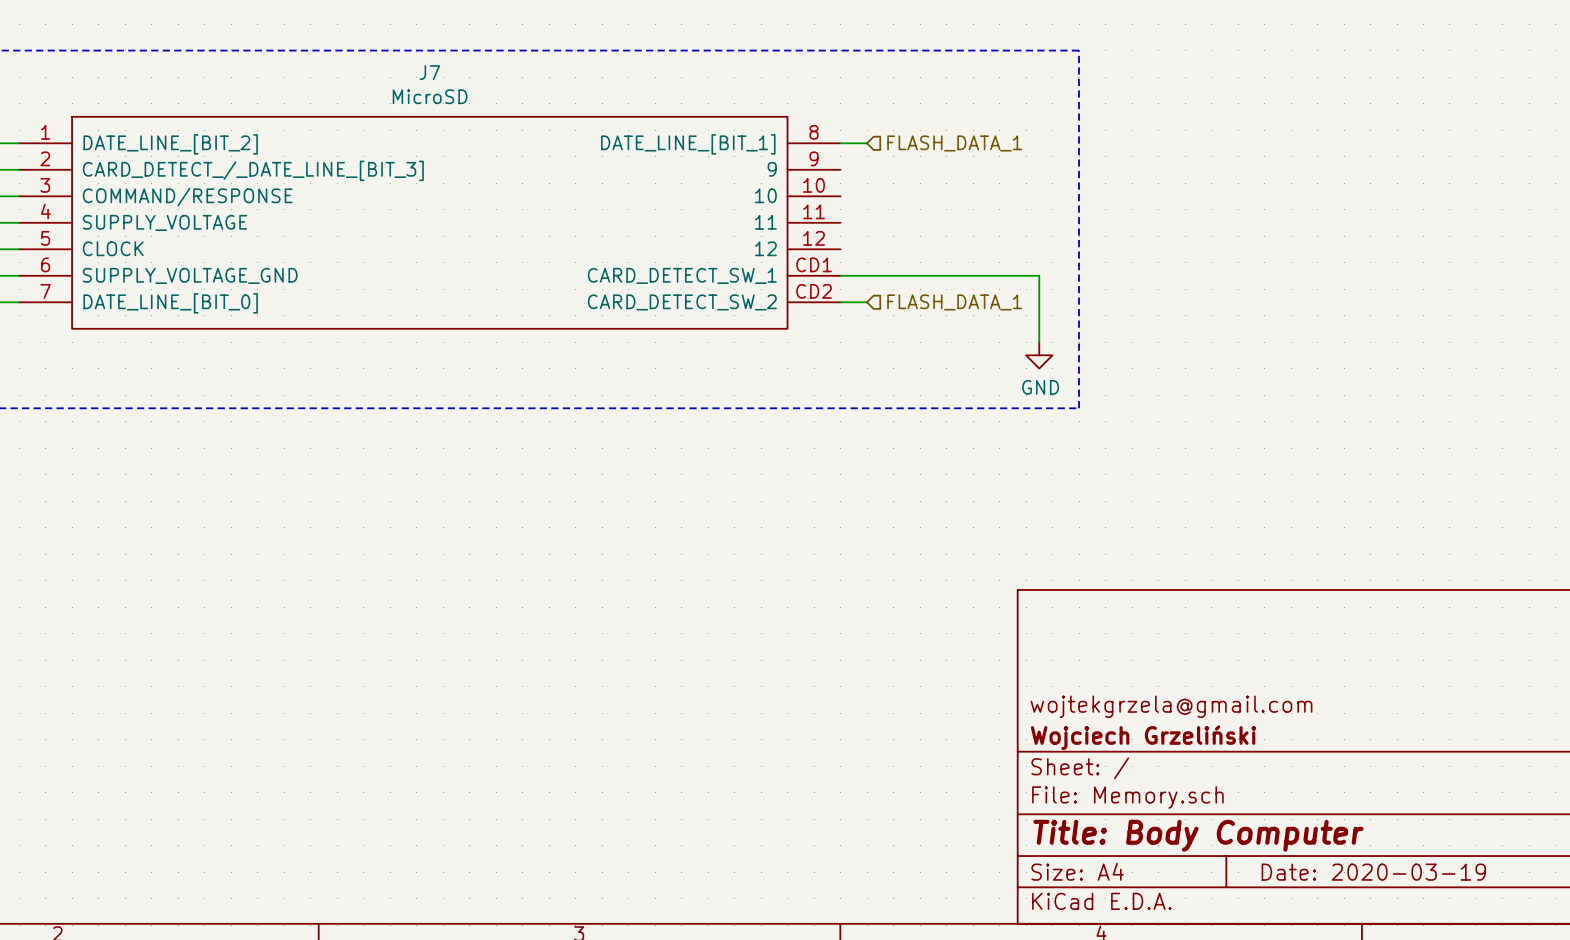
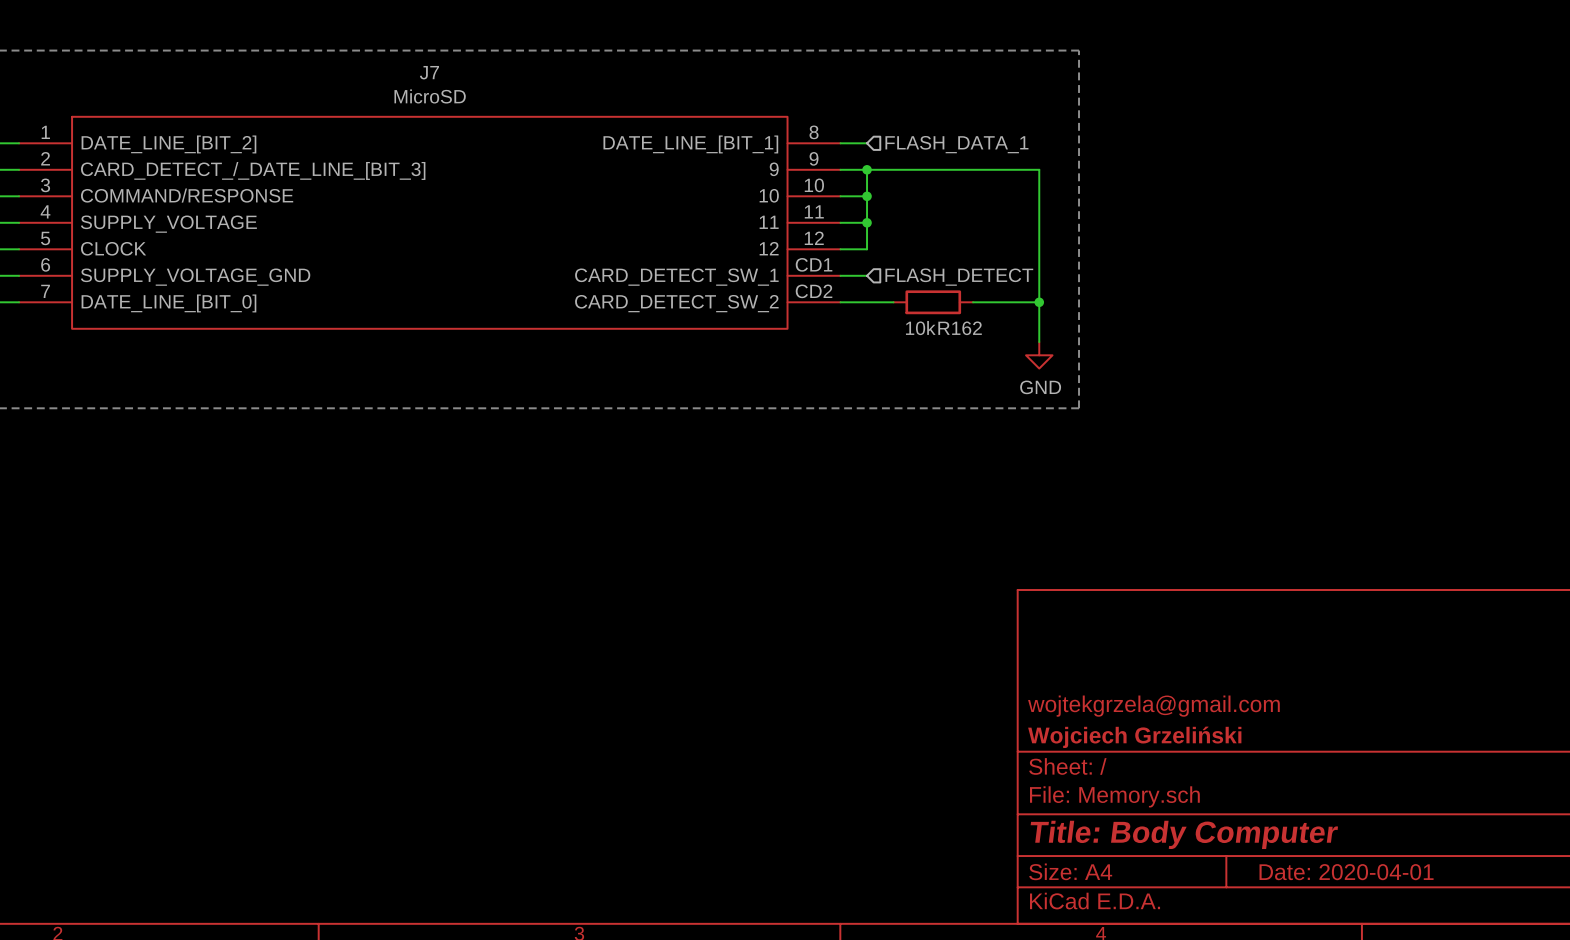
wire: none -> (867, 169) (867, 249) (840, 249)
junction: none -> (867, 169)
wire: none -> (840, 196) (867, 196)
junction: none -> (867, 196)
wire: none -> (840, 222) (867, 222)
junction: none -> (867, 222)
wire: (867, 275) (1039, 275) -> (840, 169) (1039, 169) (1039, 275)
wire: none -> (867, 302) (893, 302)
R162: none -> 10k (933, 302)
hierarchical label: FLASH_DATA_1 (954, 302) -> FLASH_DETECT (959, 277)
wire: none -> (973, 302) (1039, 302)
junction: none -> (1039, 302)
title block: Date: 2020-03-19 (1373, 872) -> Date: 2020-04-01 (1346, 872)

